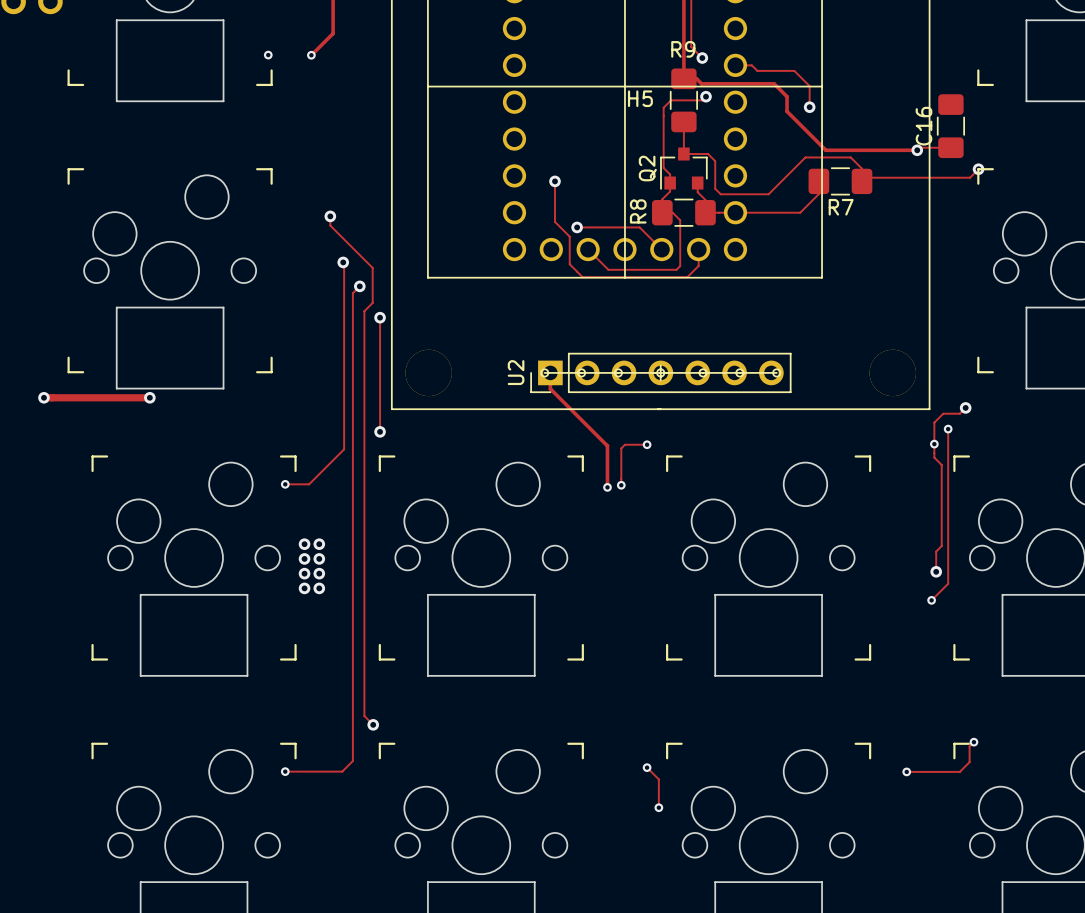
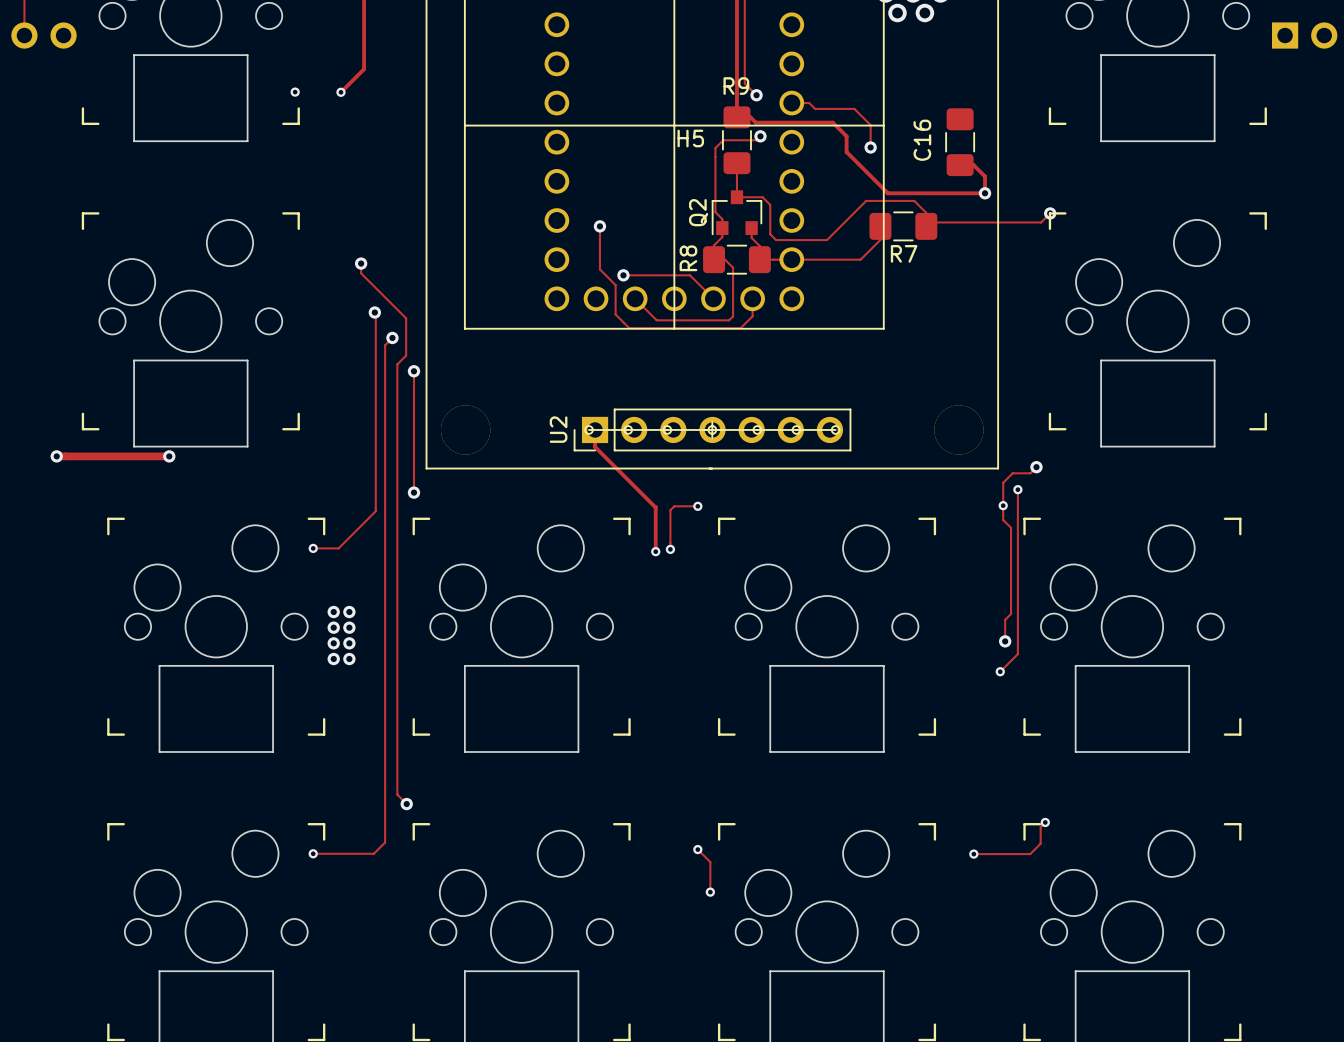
track: none -> (960, 165) (973, 165) (985, 176) (985, 193)
C16 name position: C16 (924, 126) -> C16 (922, 140)
C16 position: (950, 126) -> (960, 142)
track: (919, 147) (950, 147) -> none

